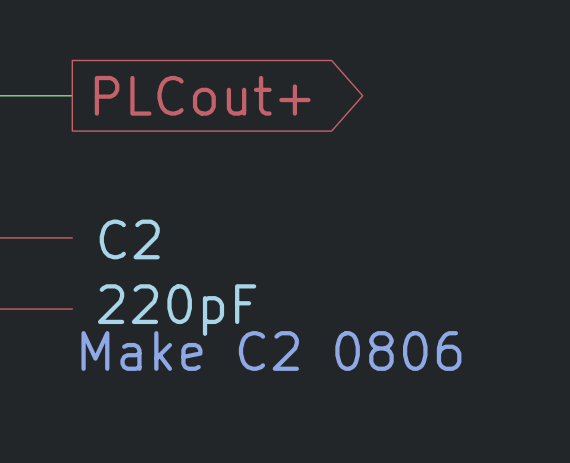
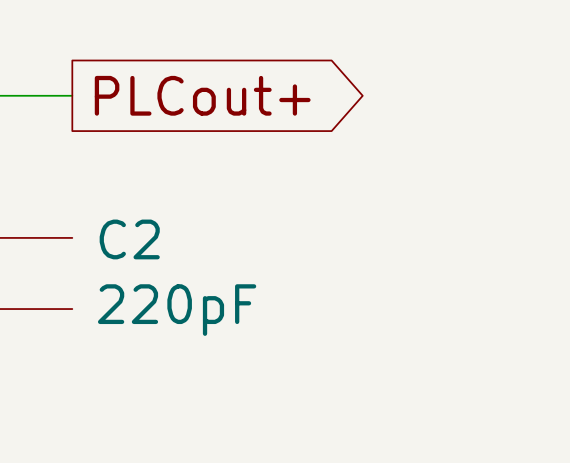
text: Make C2 0806 (271, 350) -> none

